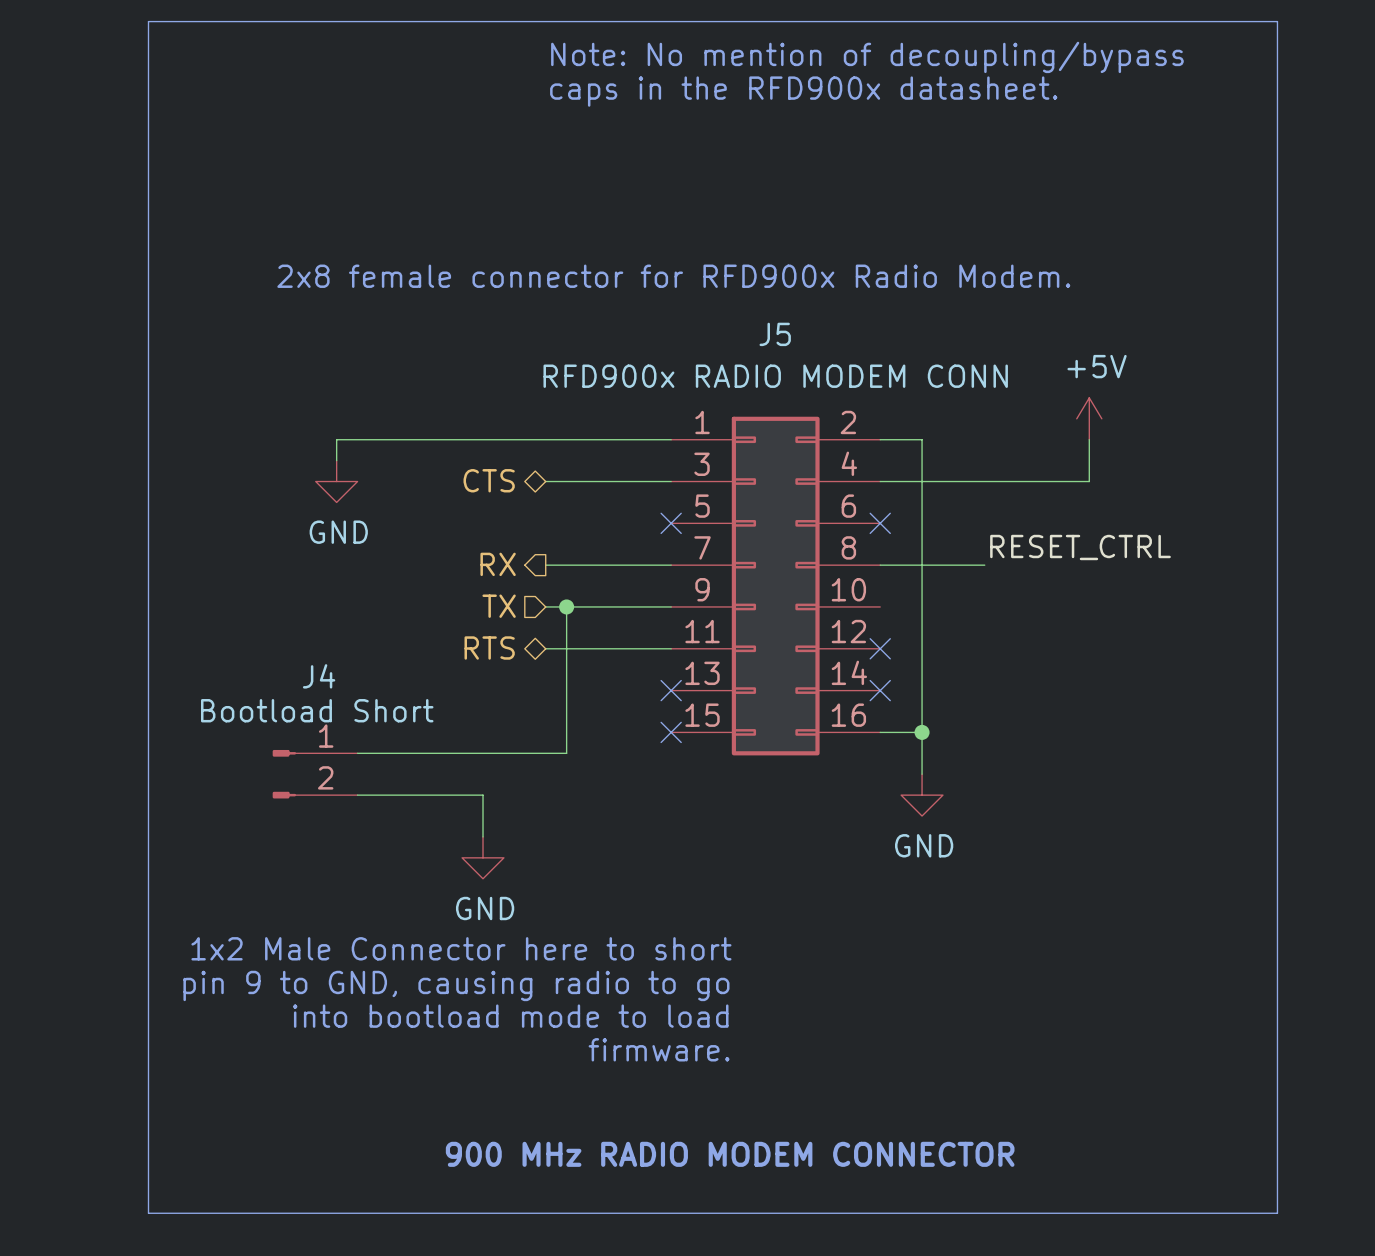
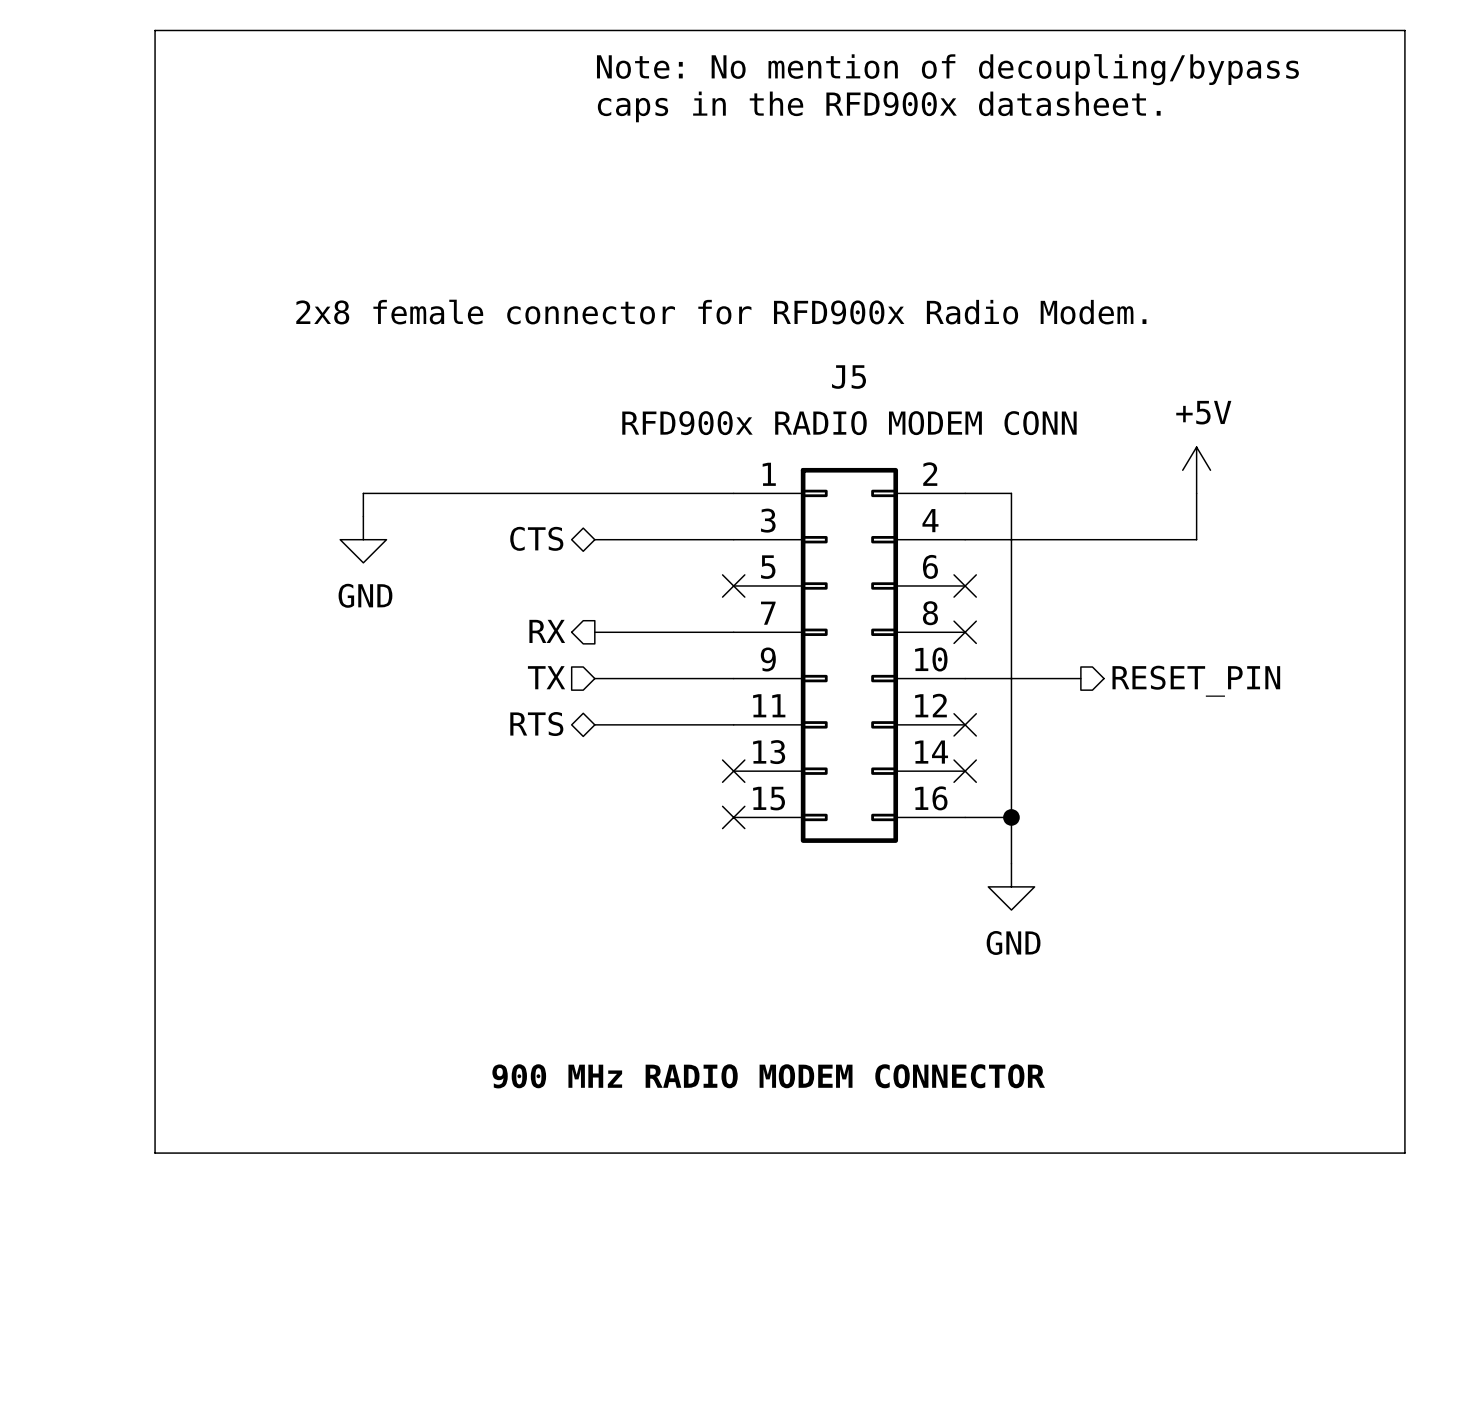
label: RESET_CTRL (1080, 547) -> none
wire: (880, 565) (984, 565) -> (965, 678) (1080, 678)
no-connect mark: none -> (965, 632)
wire: (566, 606) (566, 753) (357, 753) -> none
junction: (566, 606) -> none
hierarchical label: none -> RESET_PIN (1196, 681)
J4: Bootload Short (315, 774) -> none
wire: (357, 795) (483, 795) (483, 836) -> none
power symbol: GND (483, 857) -> none
text: 1x2 Male Connector here to short (461, 948) -> none
text: pin 9 to GND, causing radio to go (456, 985) -> none
text: into bootload mode to load (510, 1016) -> none
line: (148, 1035) (148, 1213) (1277, 1213) (1277, 1035) -> (155, 1153) (1404, 1153)
text: firmware. (659, 1049) -> none
text position: 900 MHz RADIO MODEM CONNECTOR (730, 1154) -> 900 MHz RADIO MODEM CONNECTOR (768, 1076)

